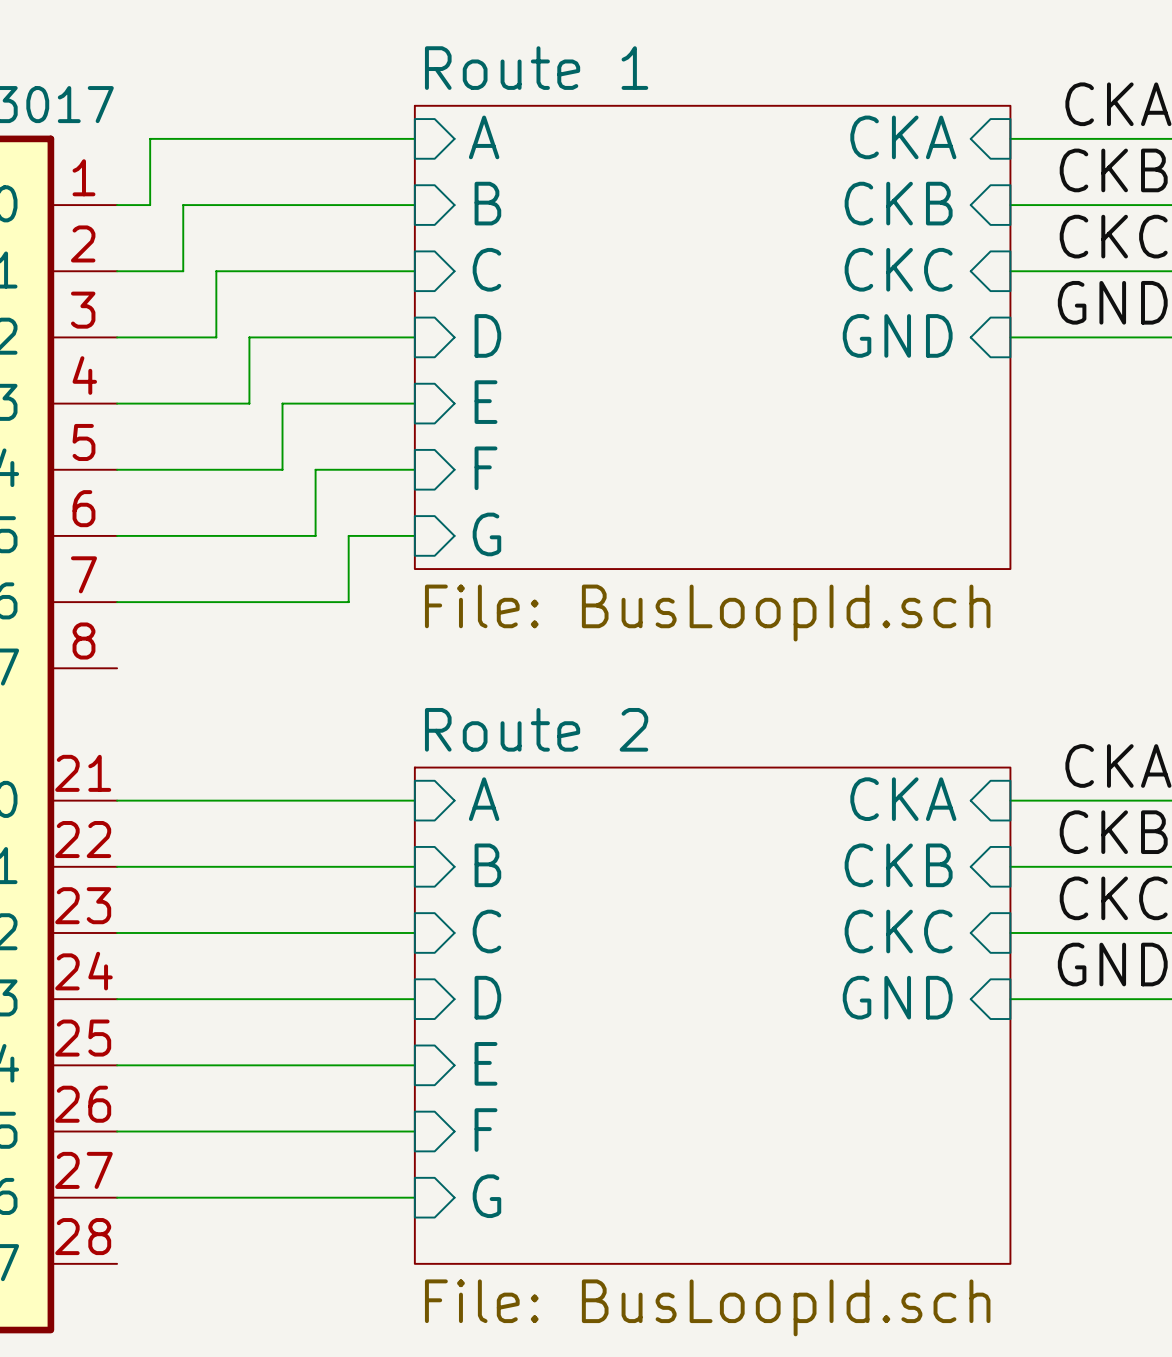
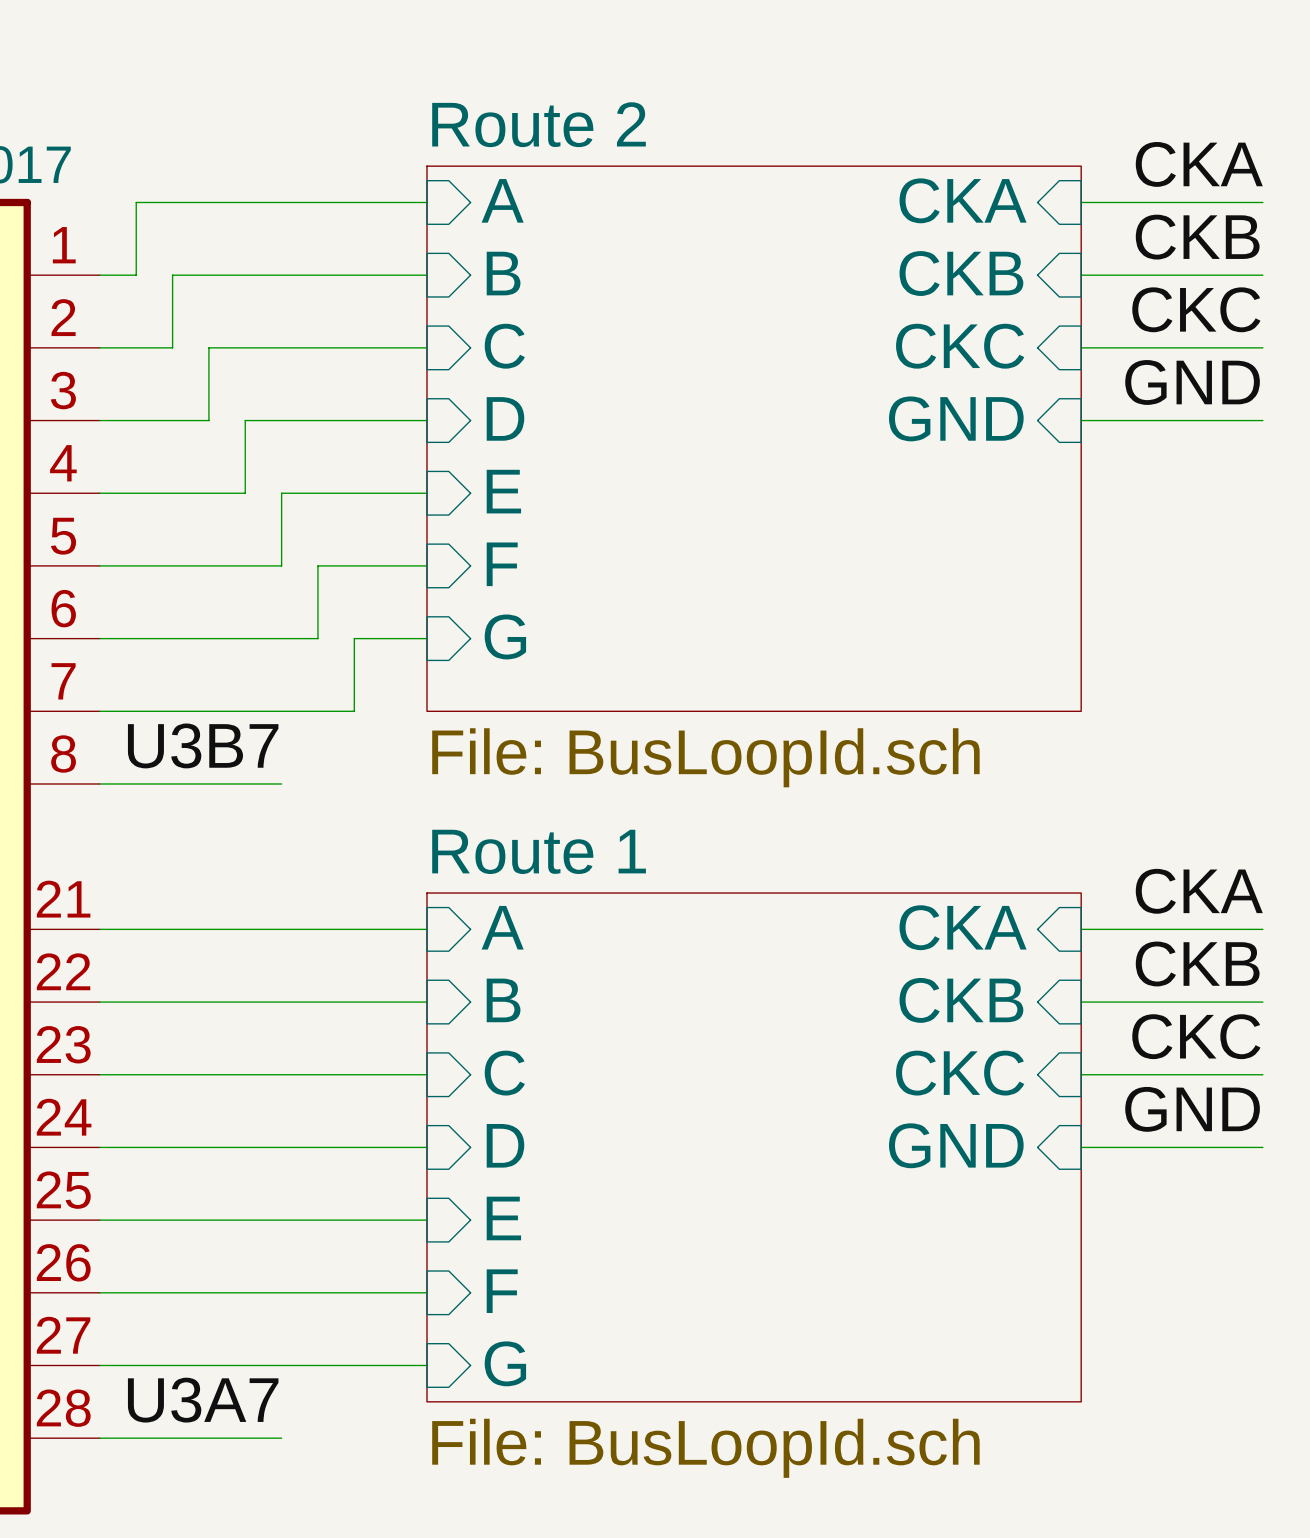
sheet Route 1 position: (712, 337) -> (754, 1147)
label: none -> U3B7 (203, 745)
wire: none -> (99, 783) (281, 783)
sheet Route 2 position: (712, 1015) -> (754, 438)
label: none -> U3A7 (203, 1400)
wire: none -> (99, 1438) (281, 1438)

